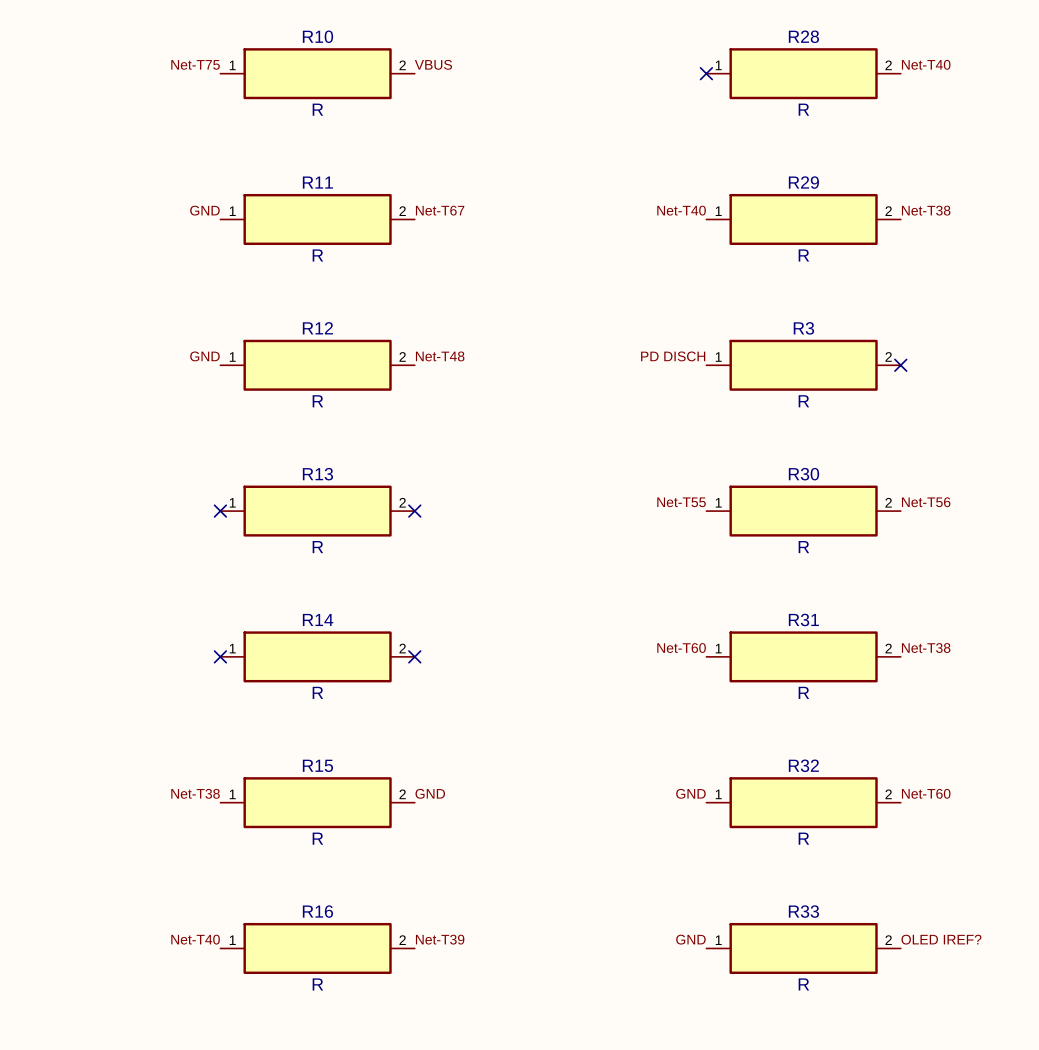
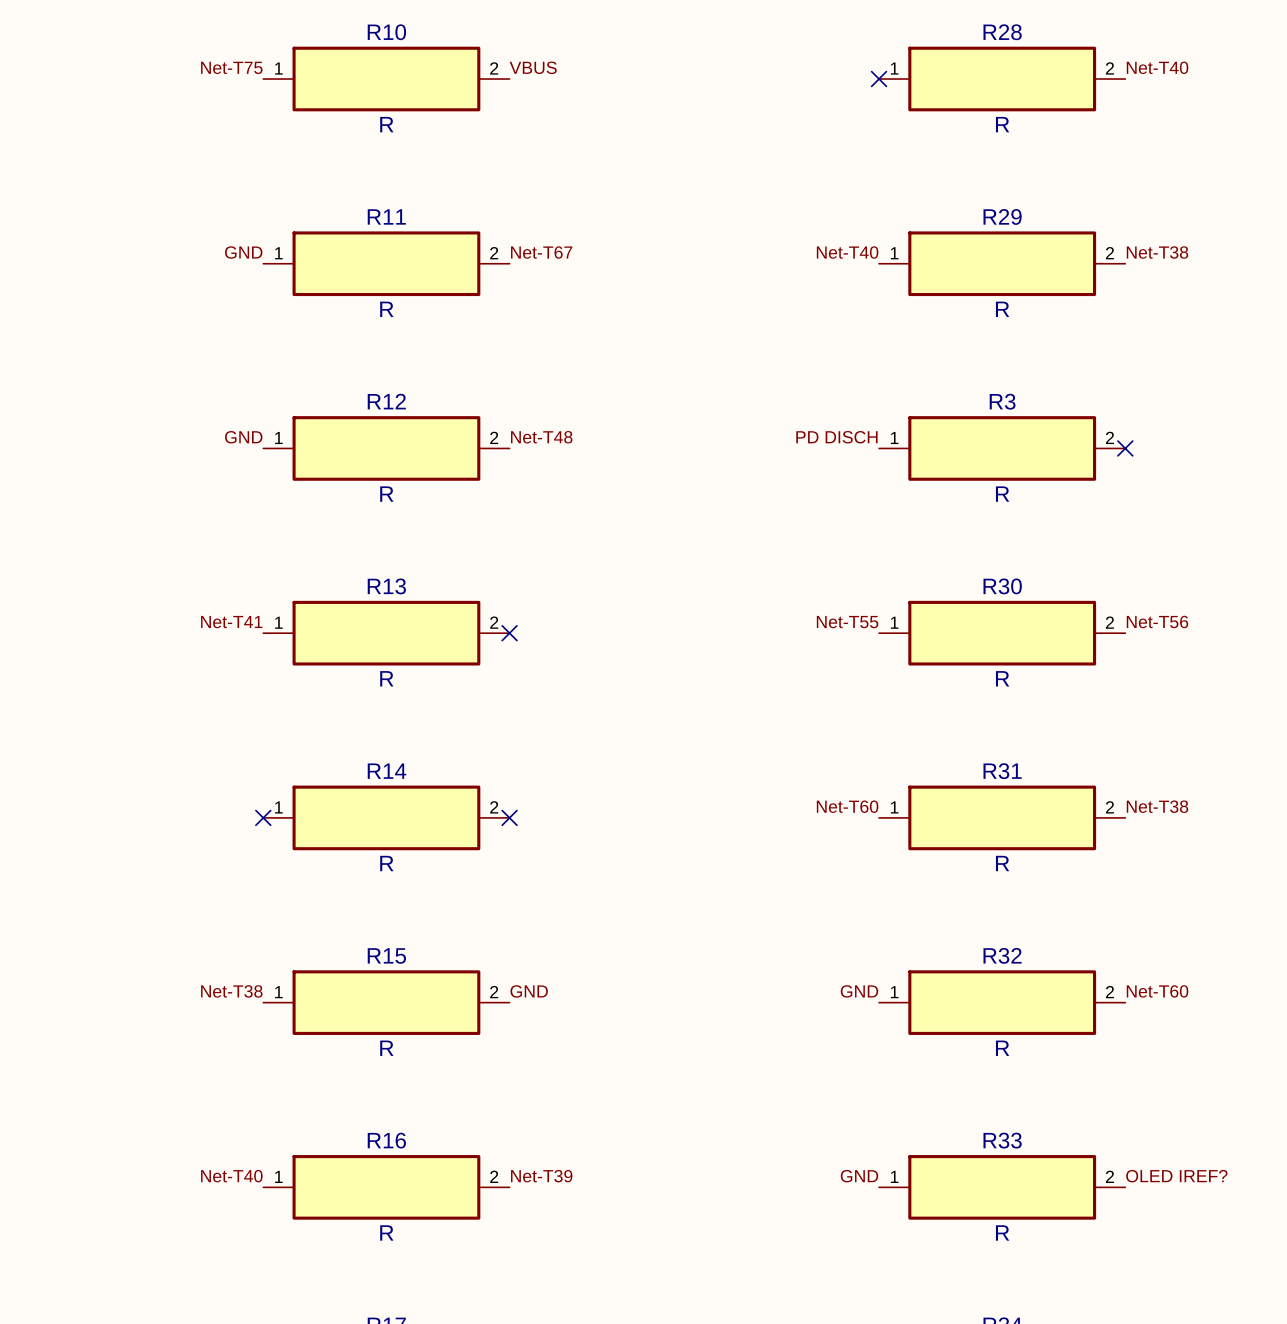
label: none -> Net-T41 (231, 622)
no-connect mark: (220, 511) -> none

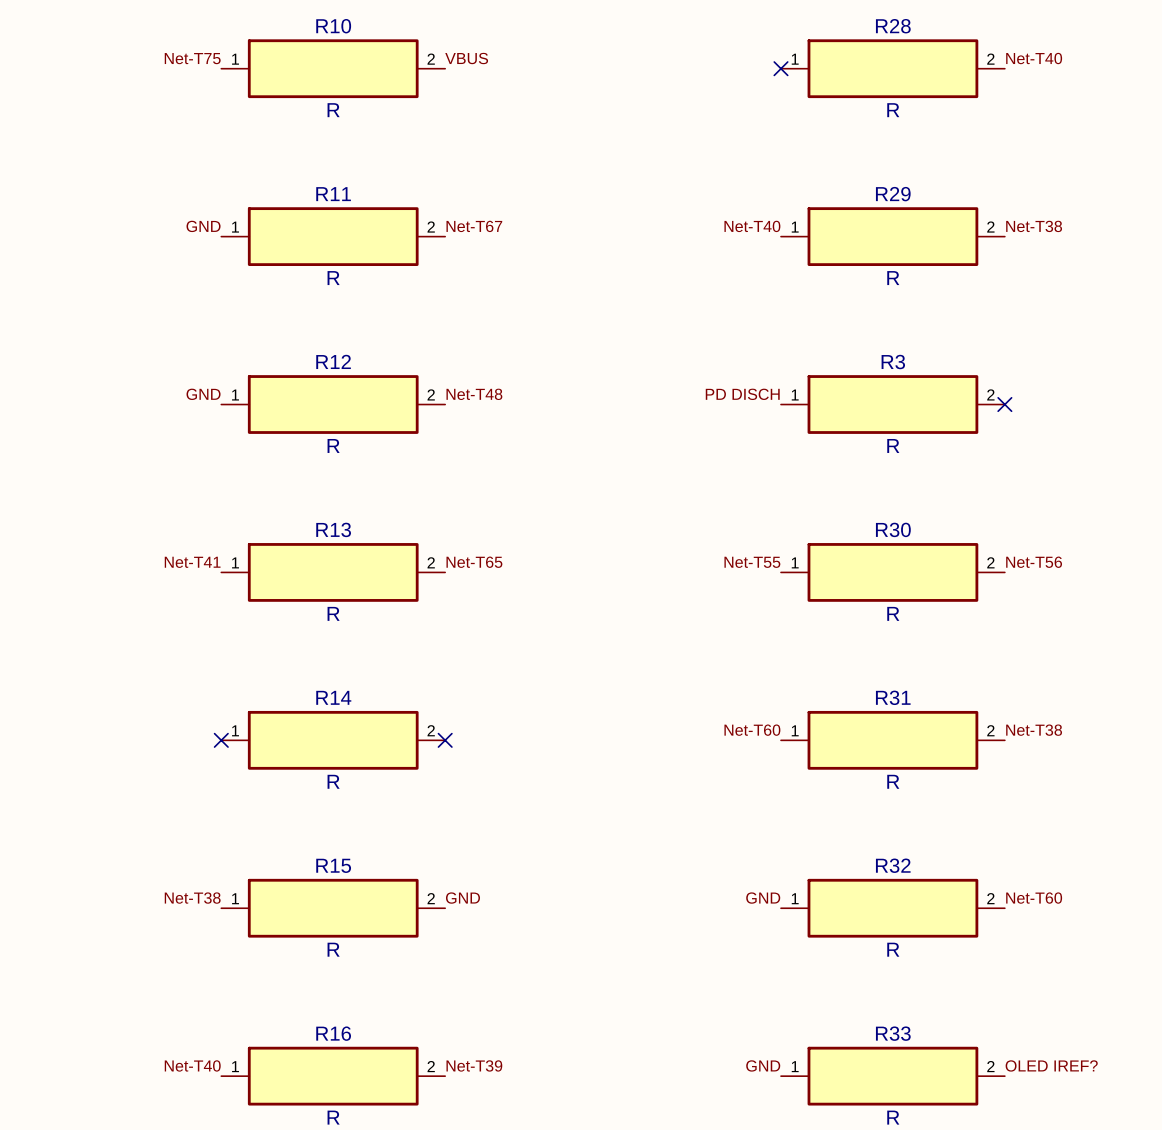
label: none -> Net-T65 (474, 562)
no-connect mark: (509, 633) -> none

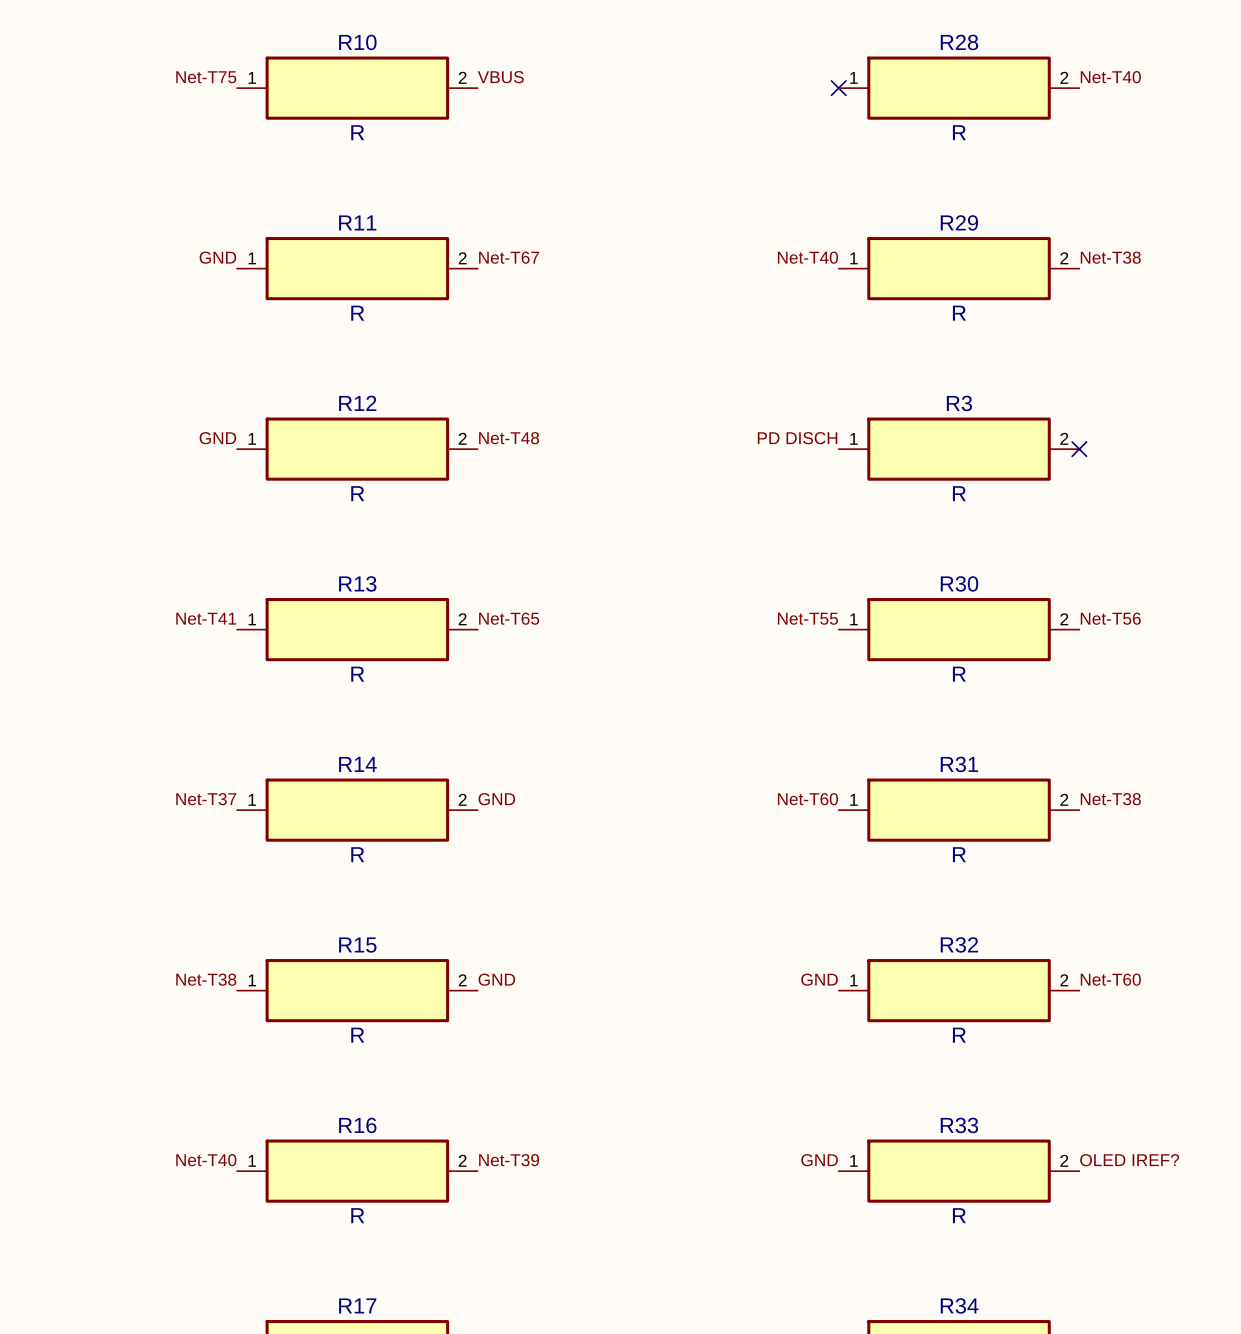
label: none -> Net-T37 (206, 799)
label: none -> GND (496, 799)
no-connect mark: (221, 740) -> none
no-connect mark: (445, 740) -> none

